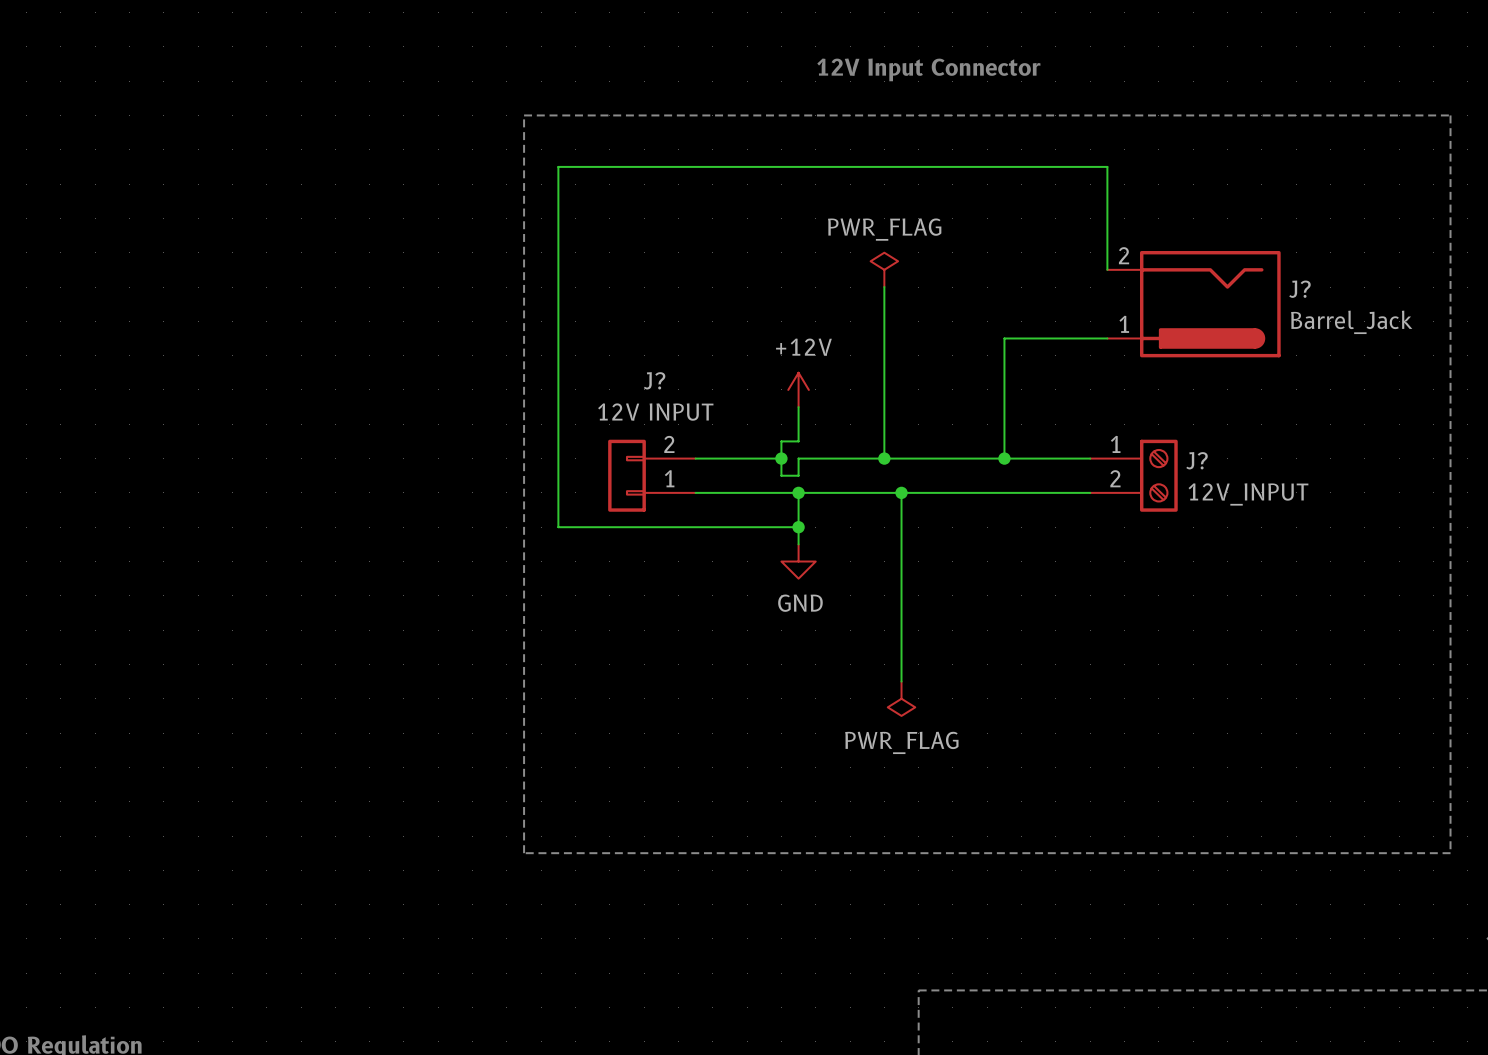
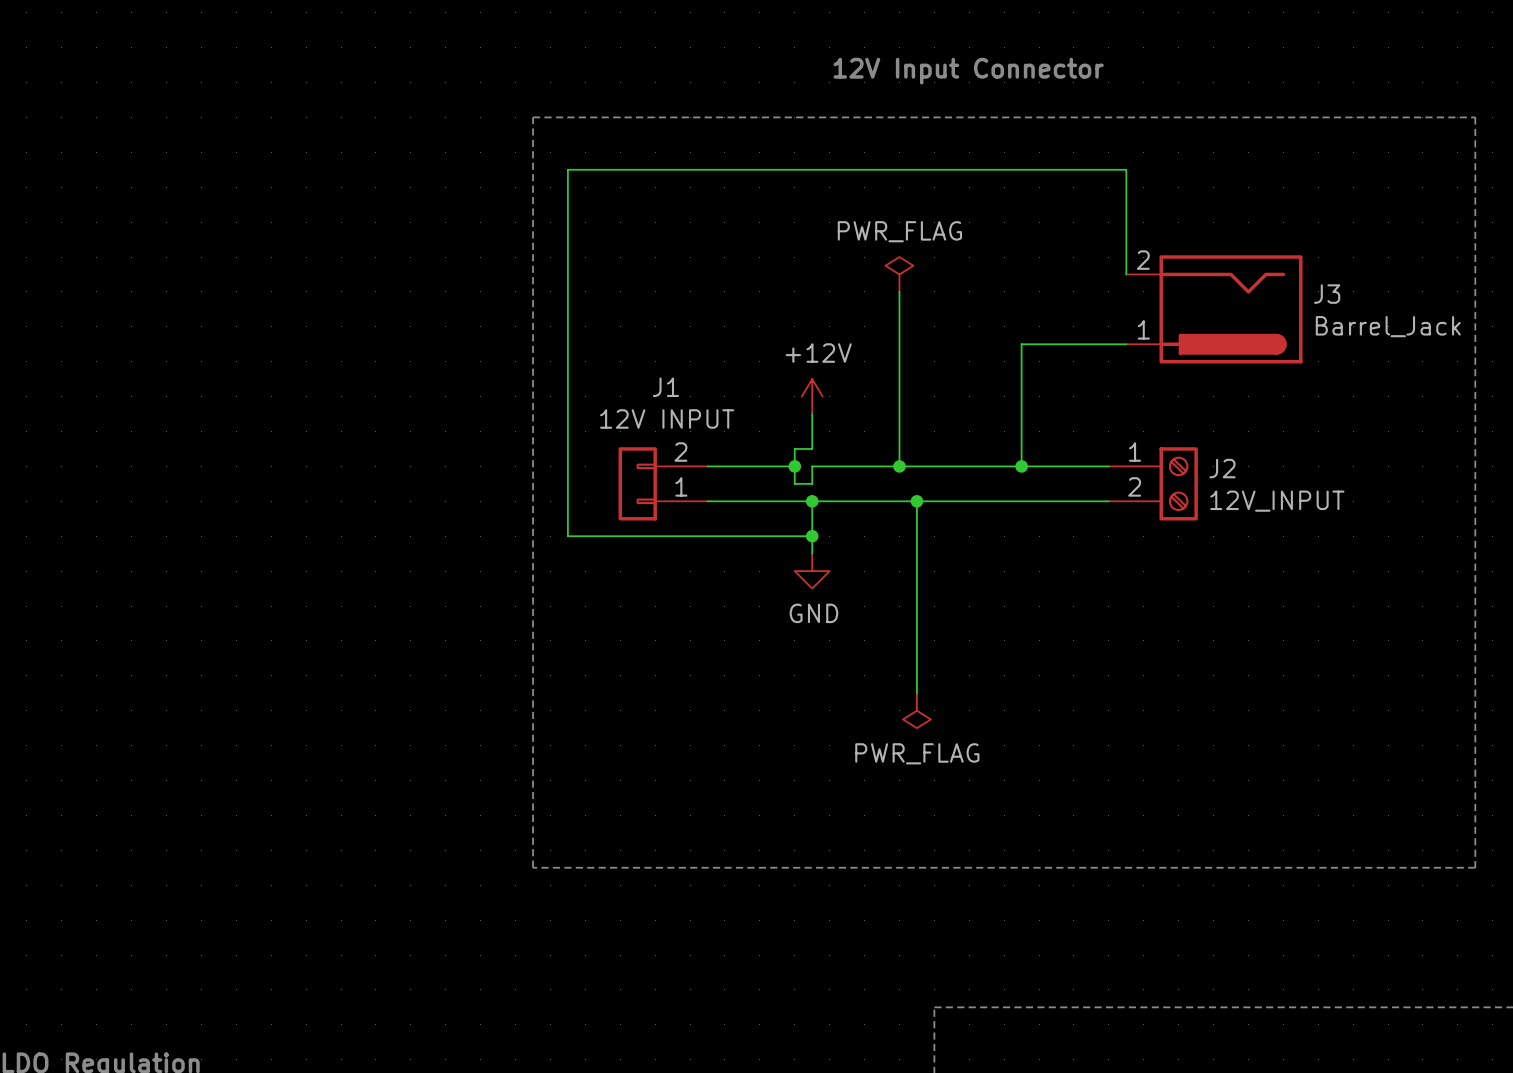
J? name: J? (1299, 289) -> J3 (1327, 294)
J? name: J? (654, 380) -> J1 (665, 387)
J? name: J? (1197, 460) -> J2 (1222, 468)

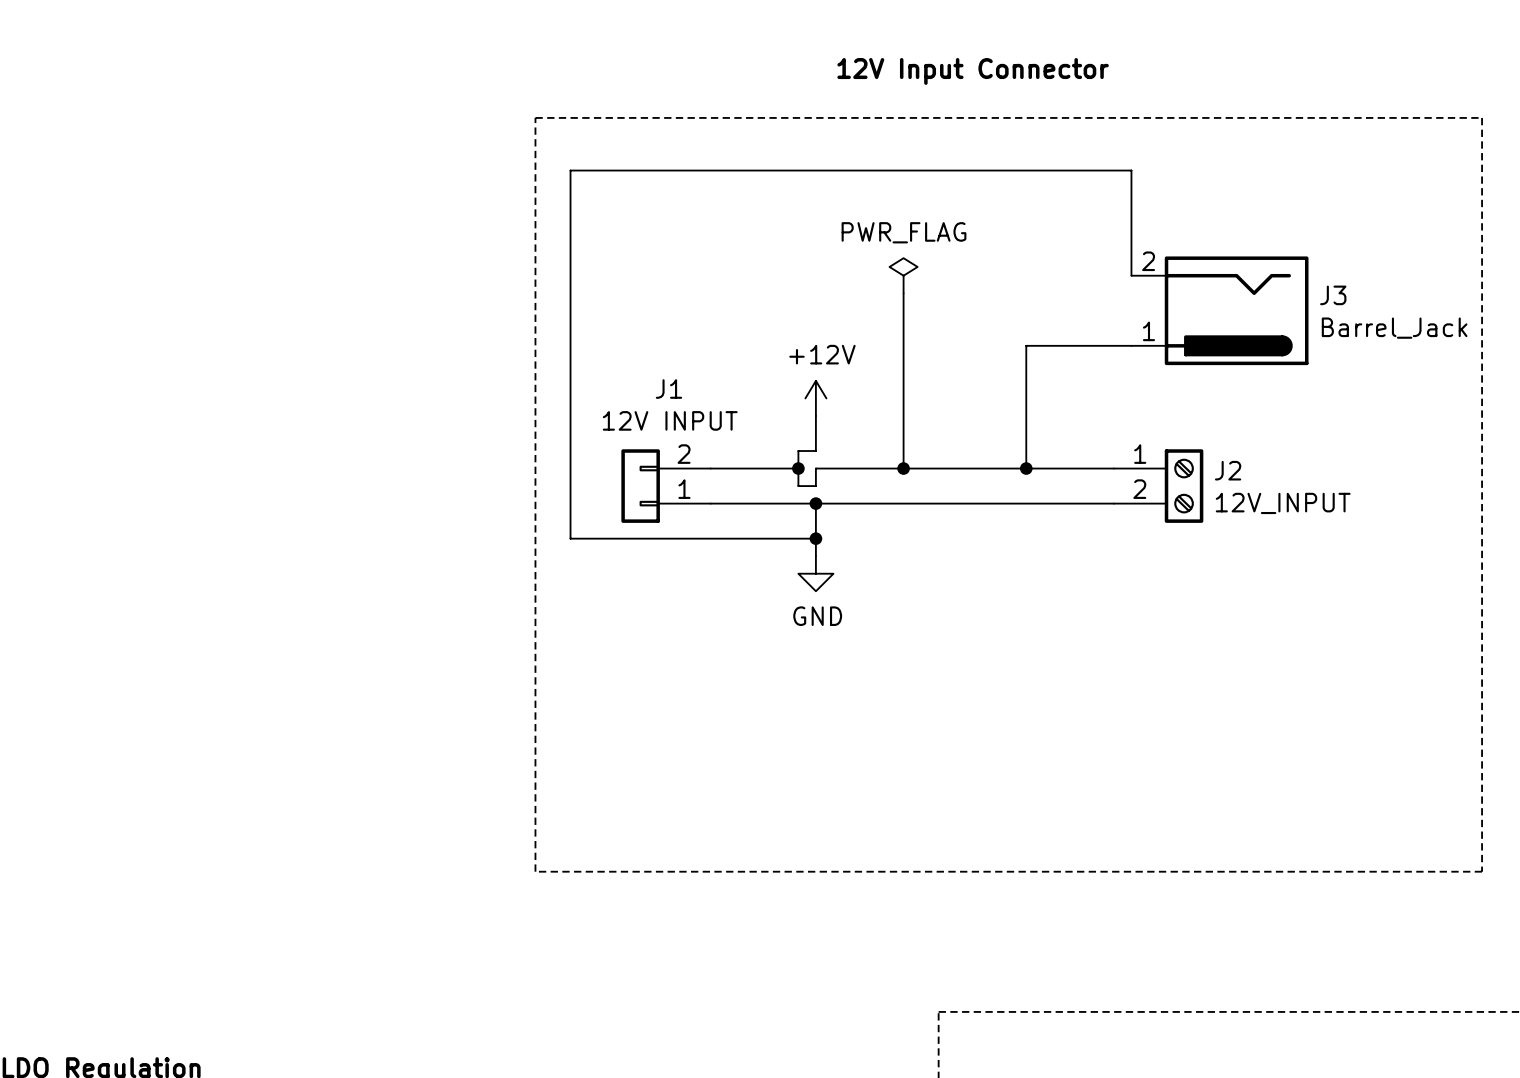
wire: (916, 501) (916, 693) -> none
junction: (916, 501) -> none
power symbol: PWR_FLAG (916, 710) -> none

